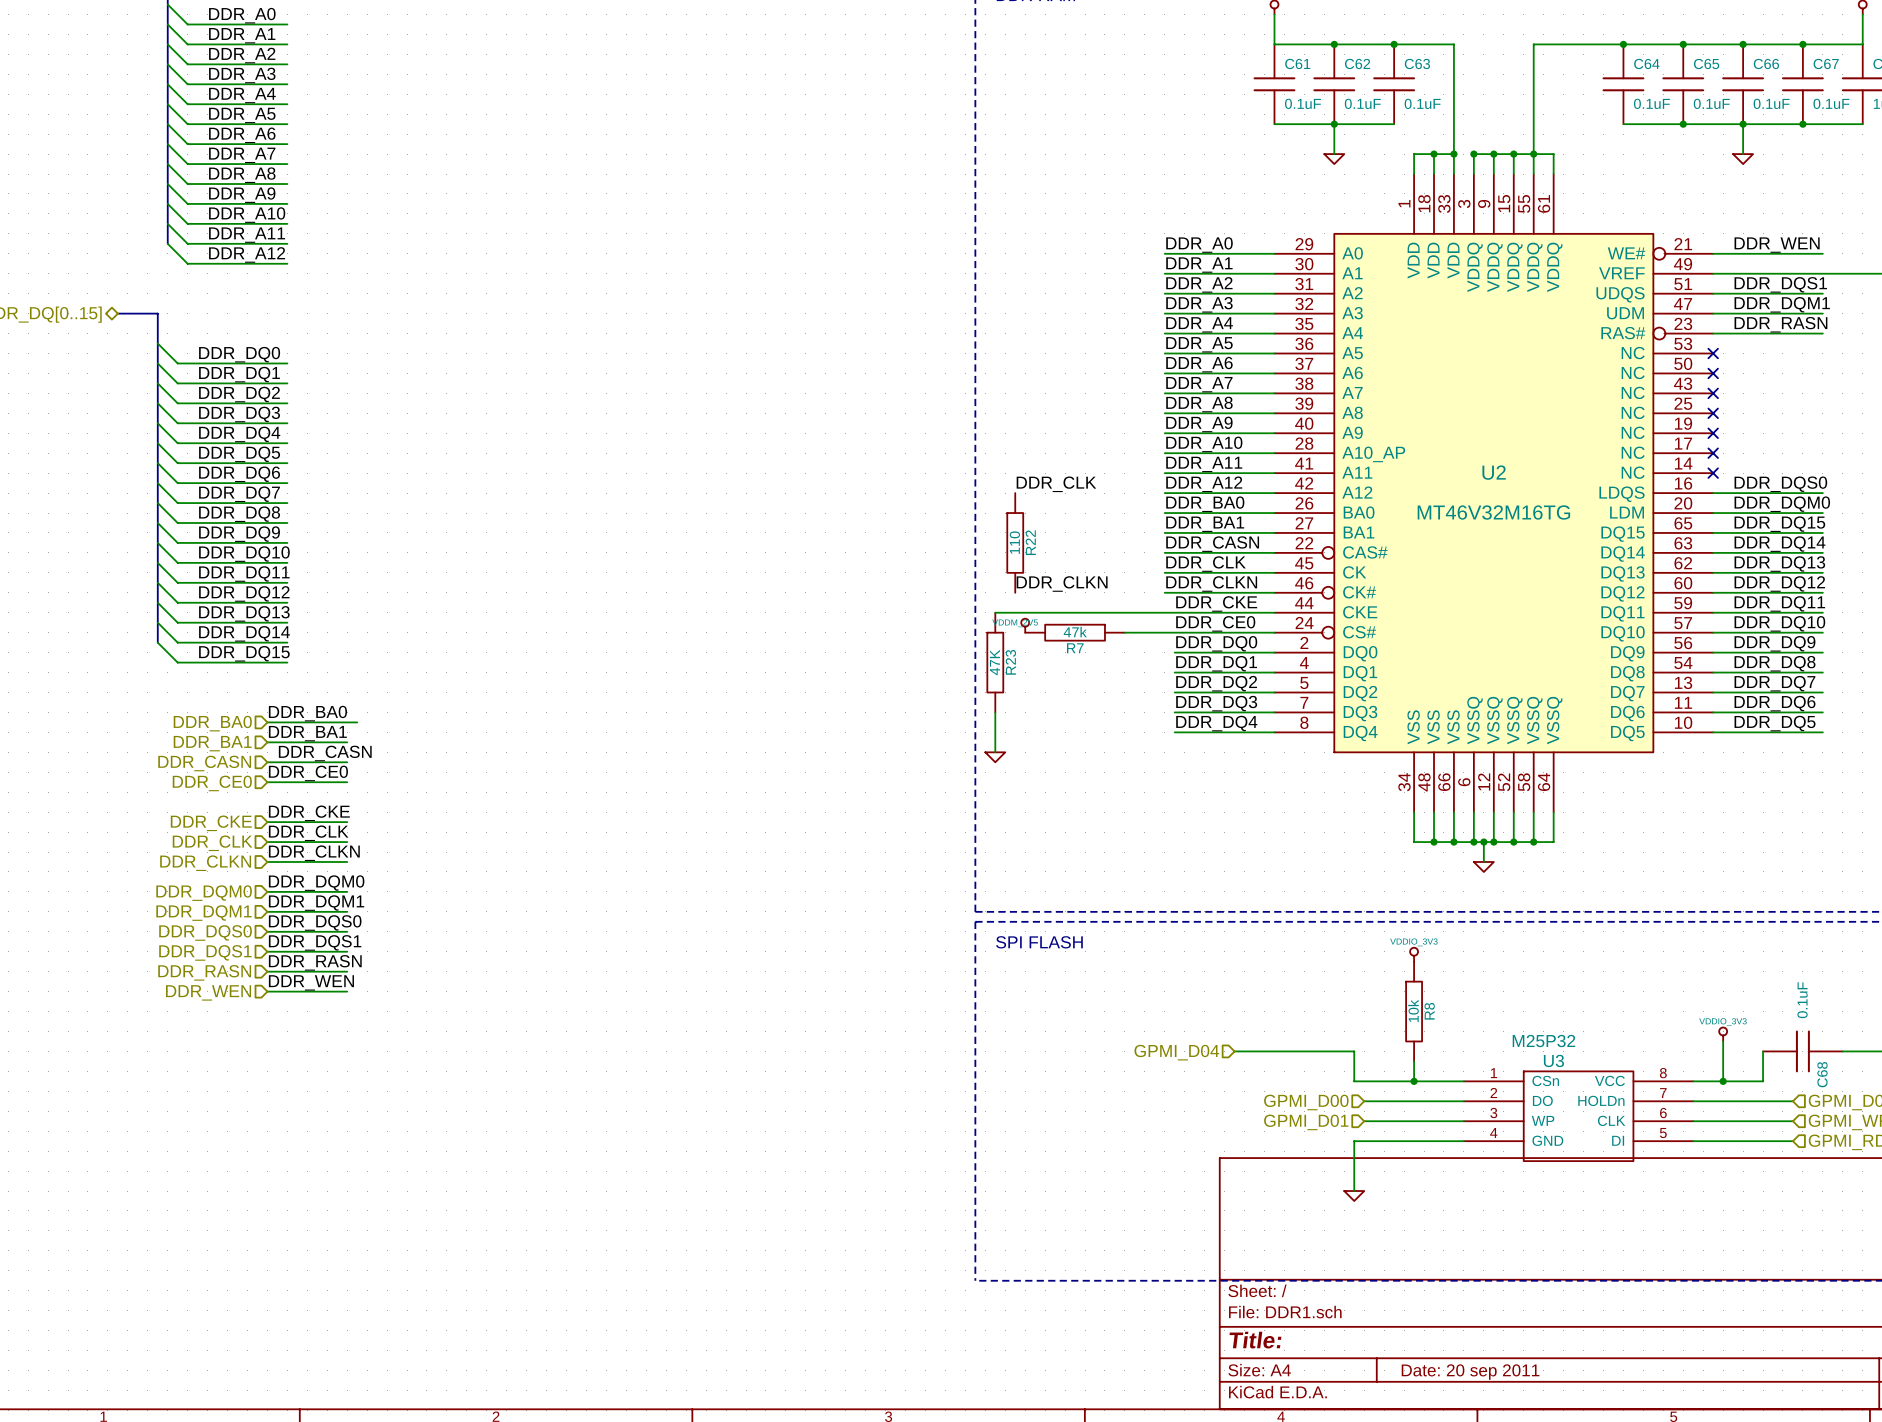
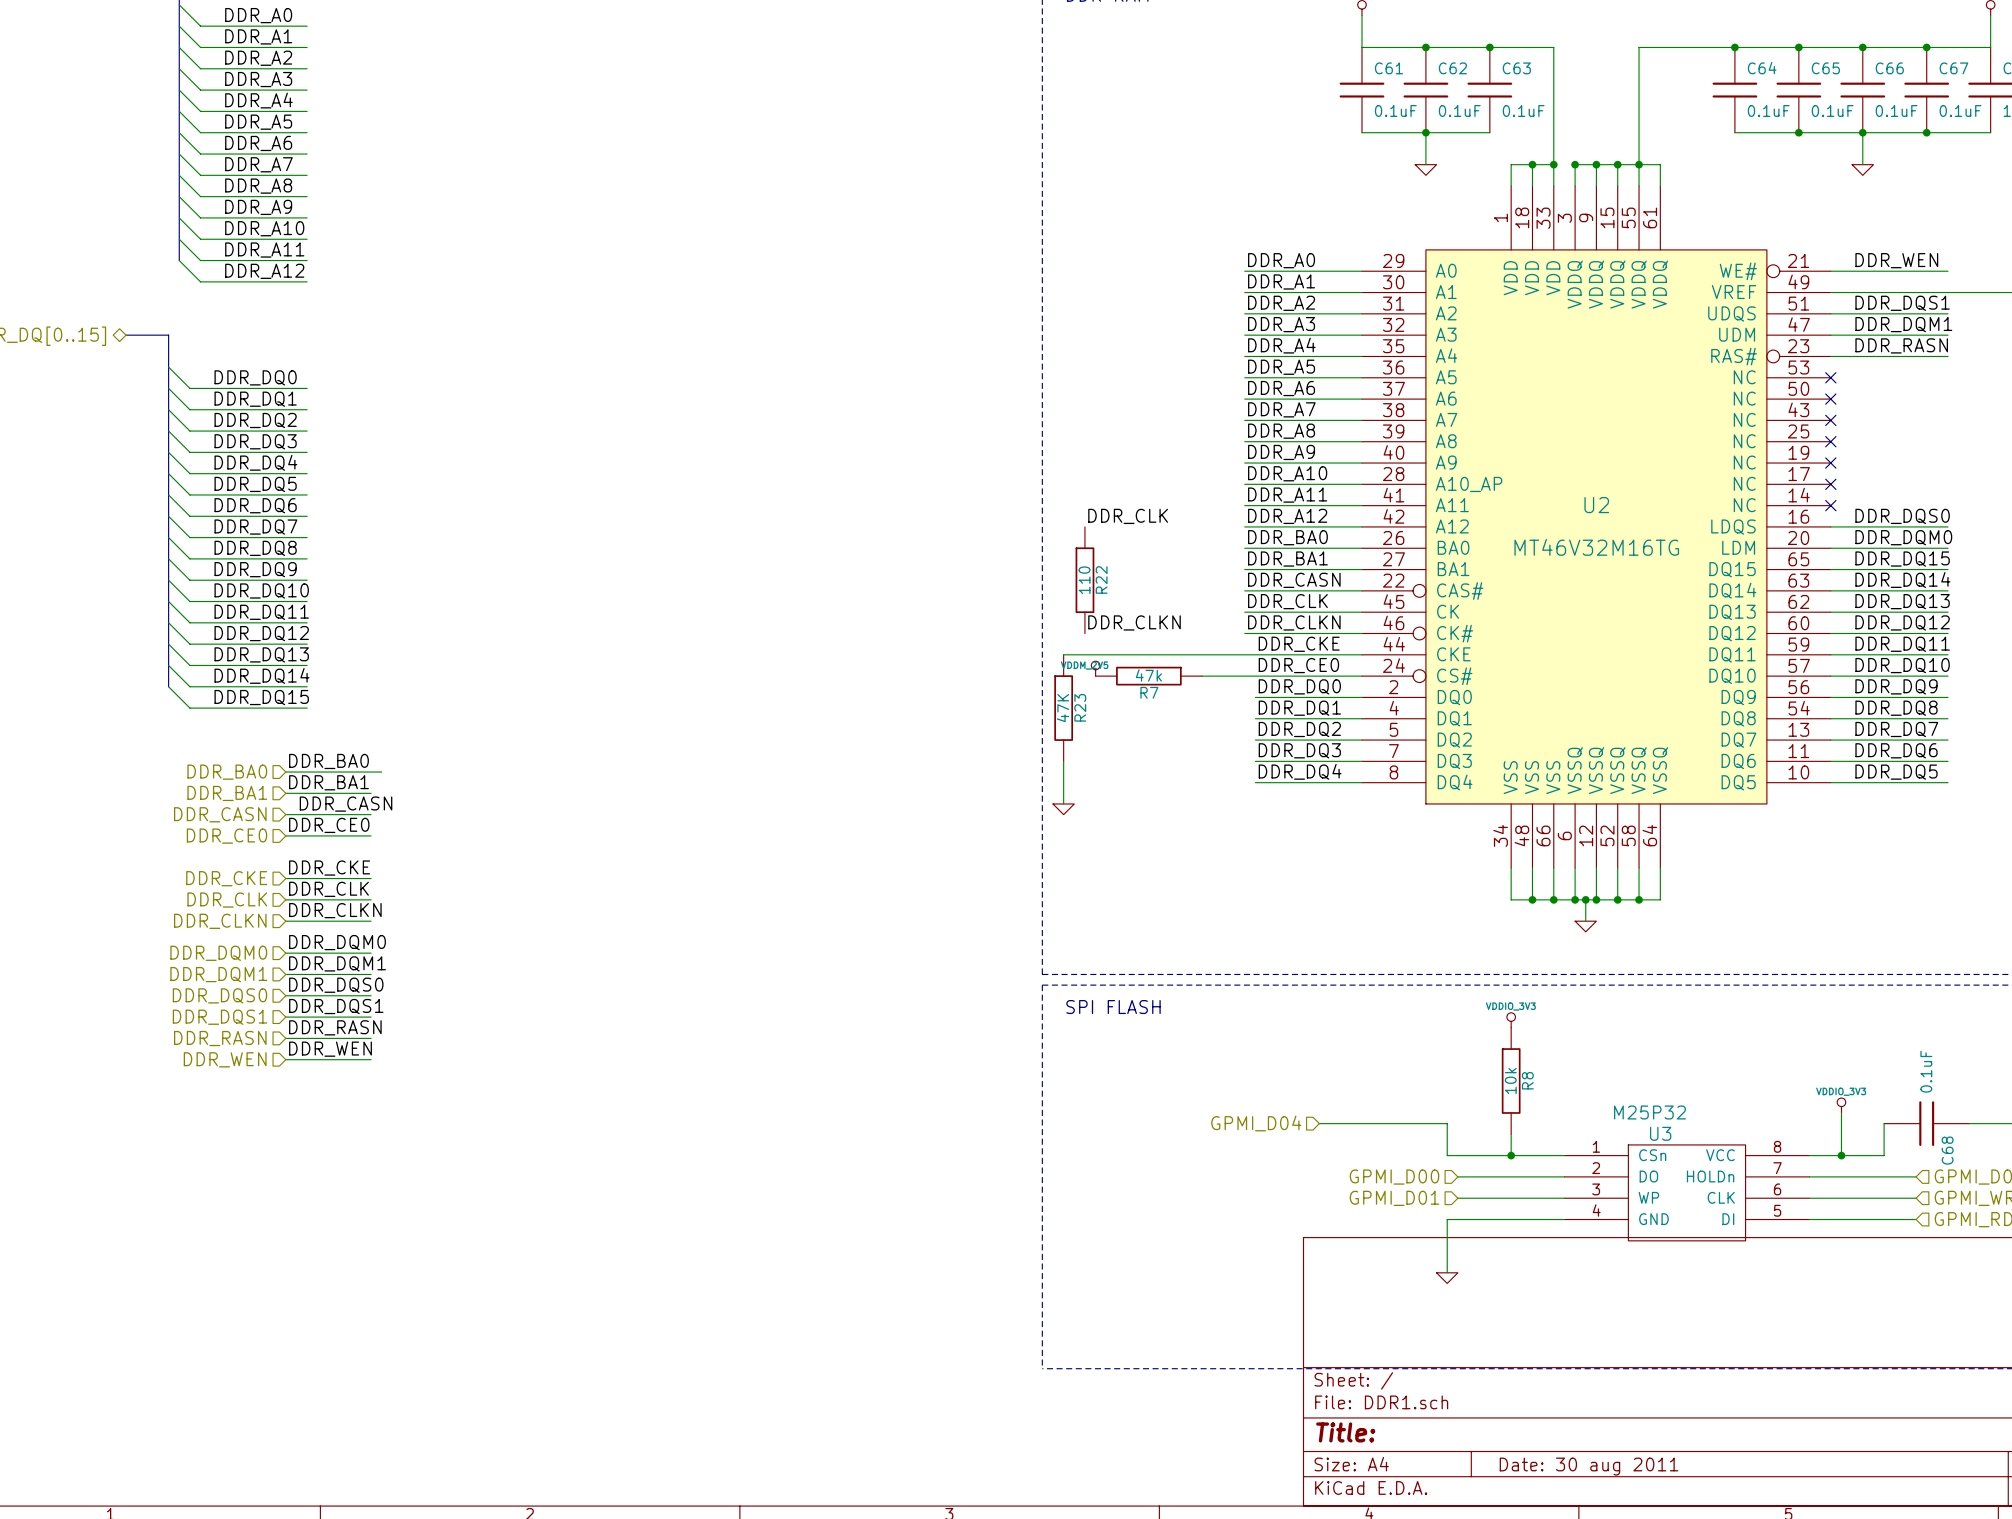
title block: Date: 20 sep 2011 (1470, 1372) -> Date: 30 aug 2011 (1589, 1466)

